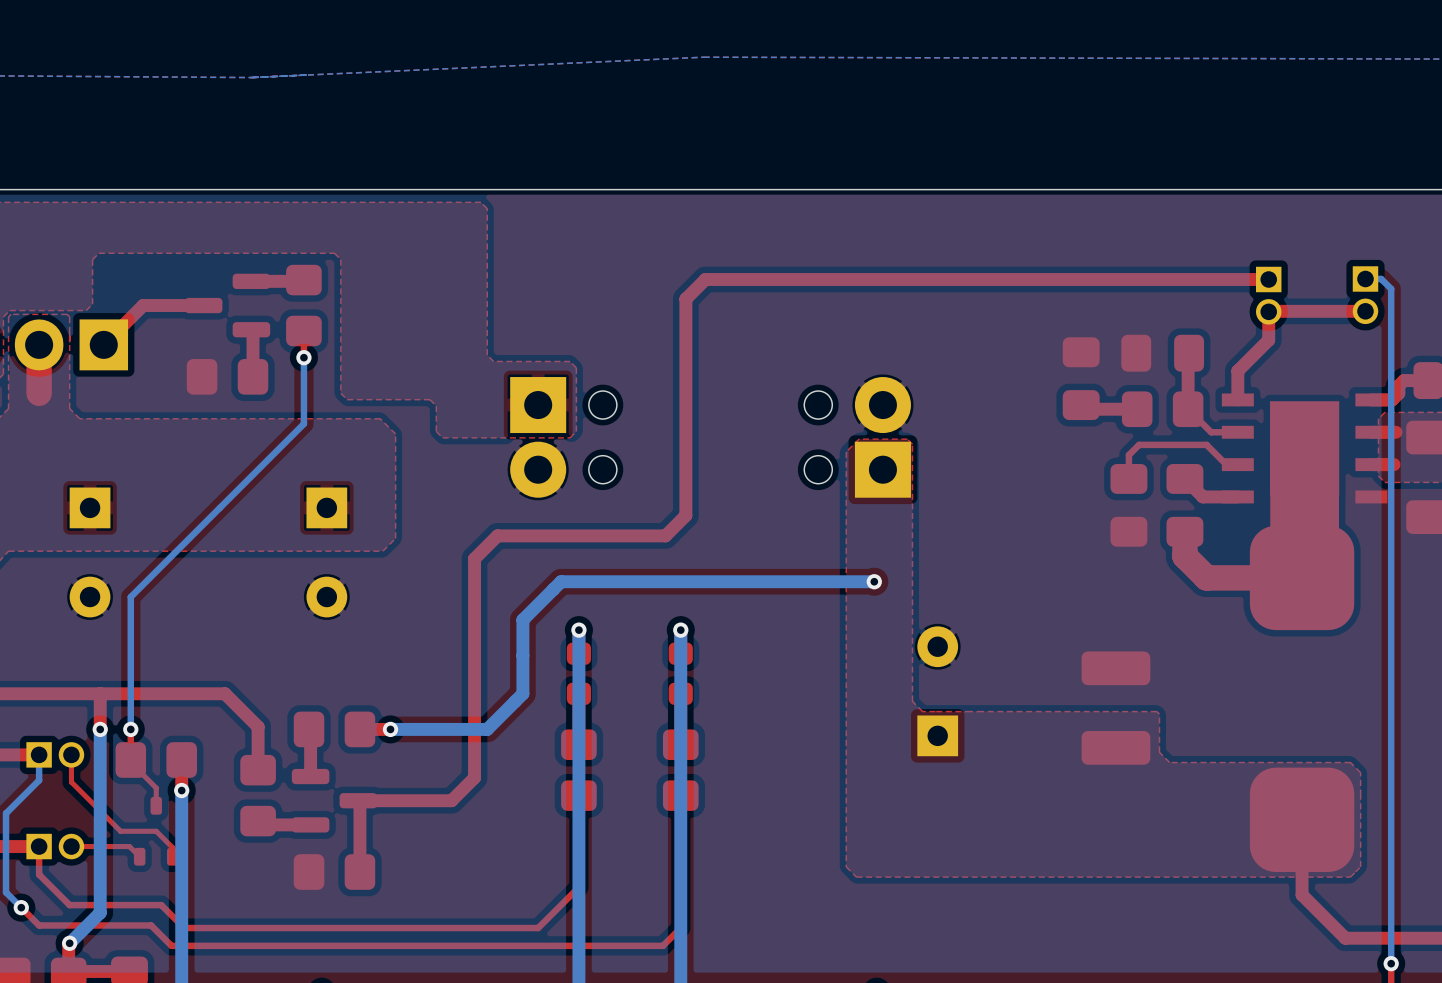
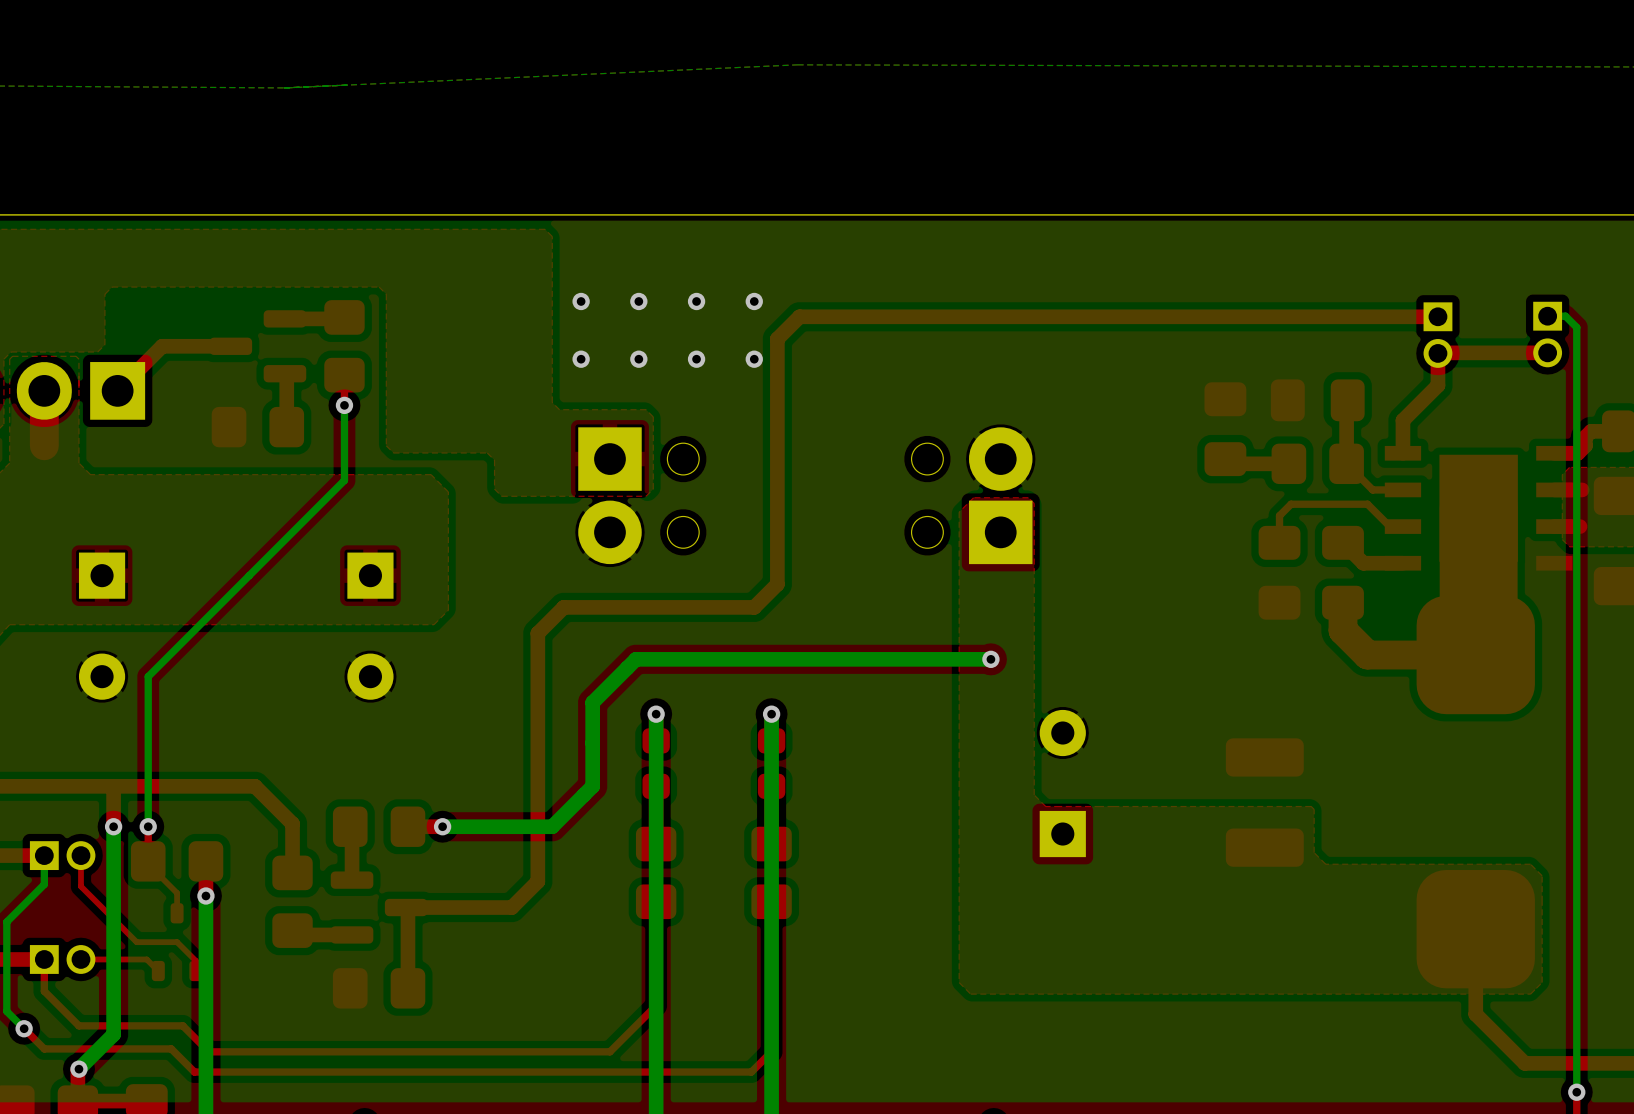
via: none -> (581, 301)
via: none -> (638, 301)
via: none -> (696, 301)
via: none -> (754, 301)
via: none -> (581, 359)
via: none -> (638, 359)
via: none -> (696, 359)
via: none -> (754, 359)

